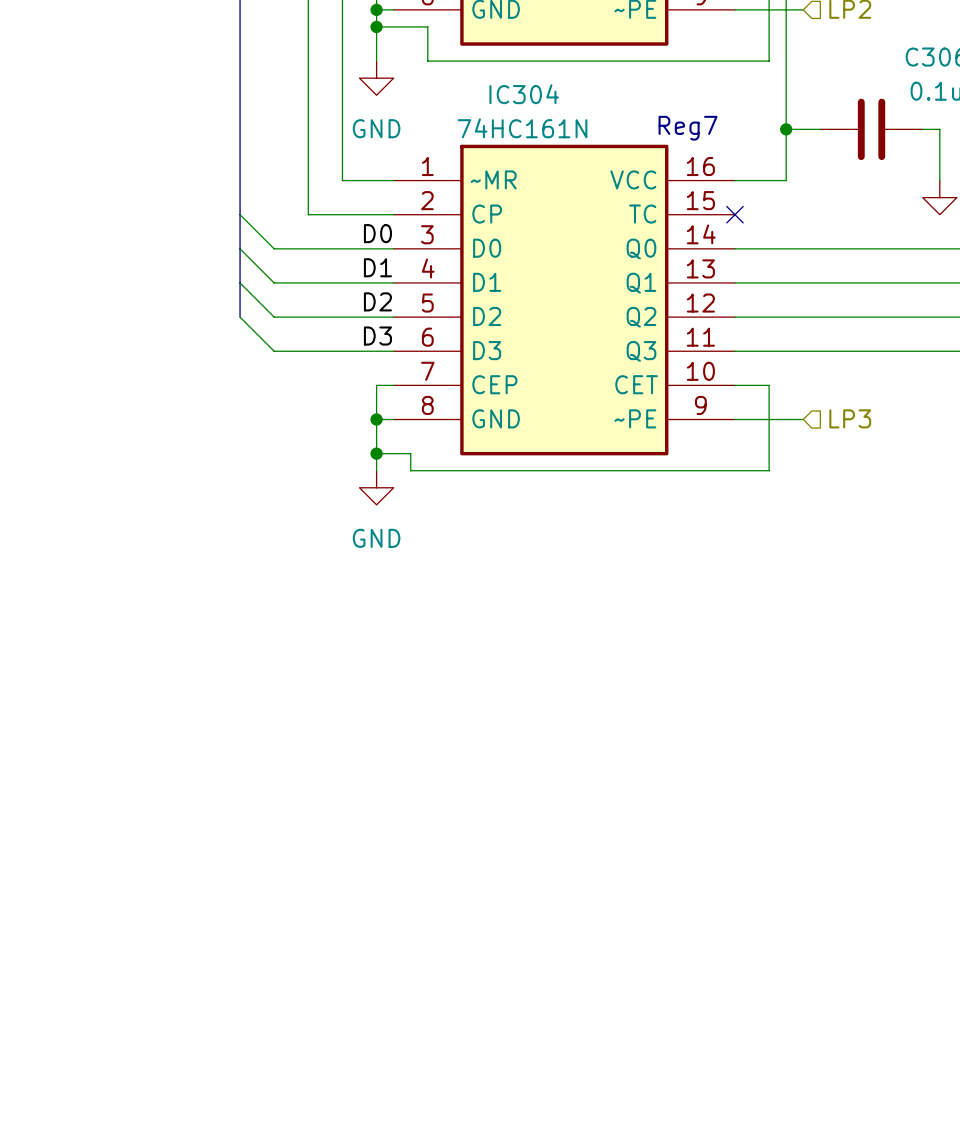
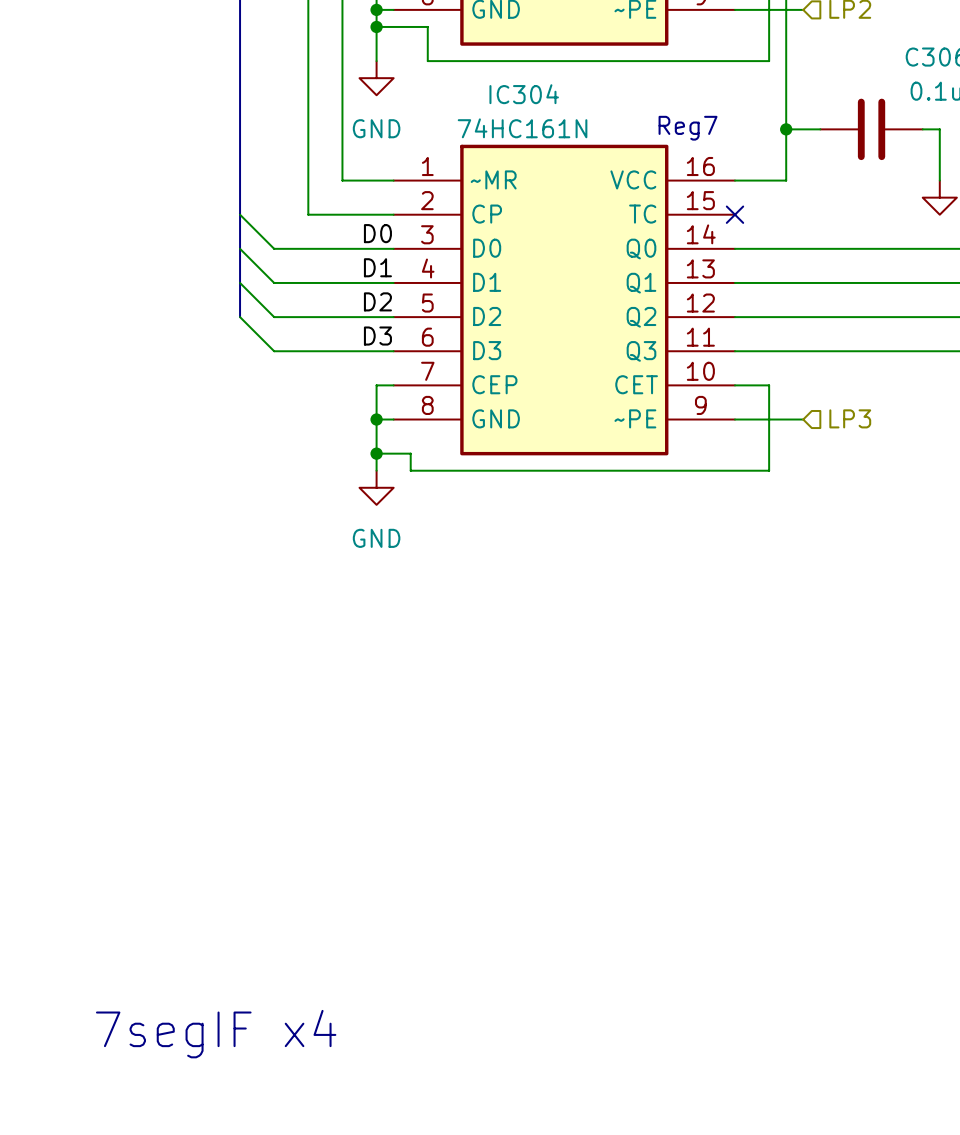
text: none -> 7segIF x4 (216, 1034)

